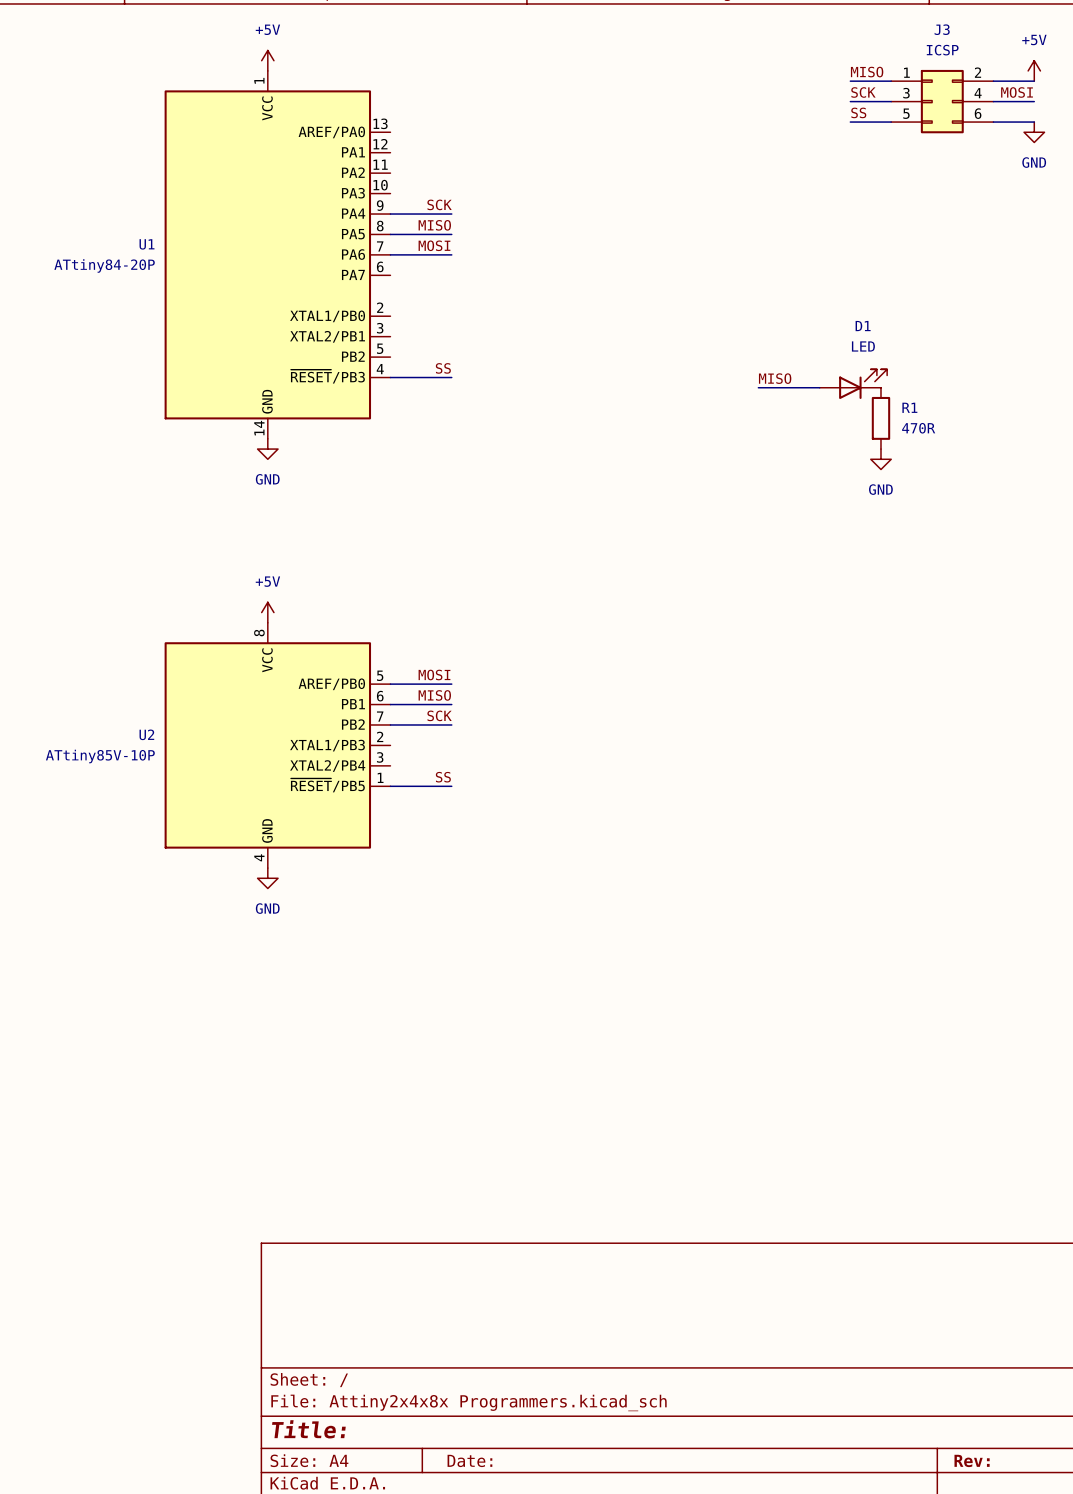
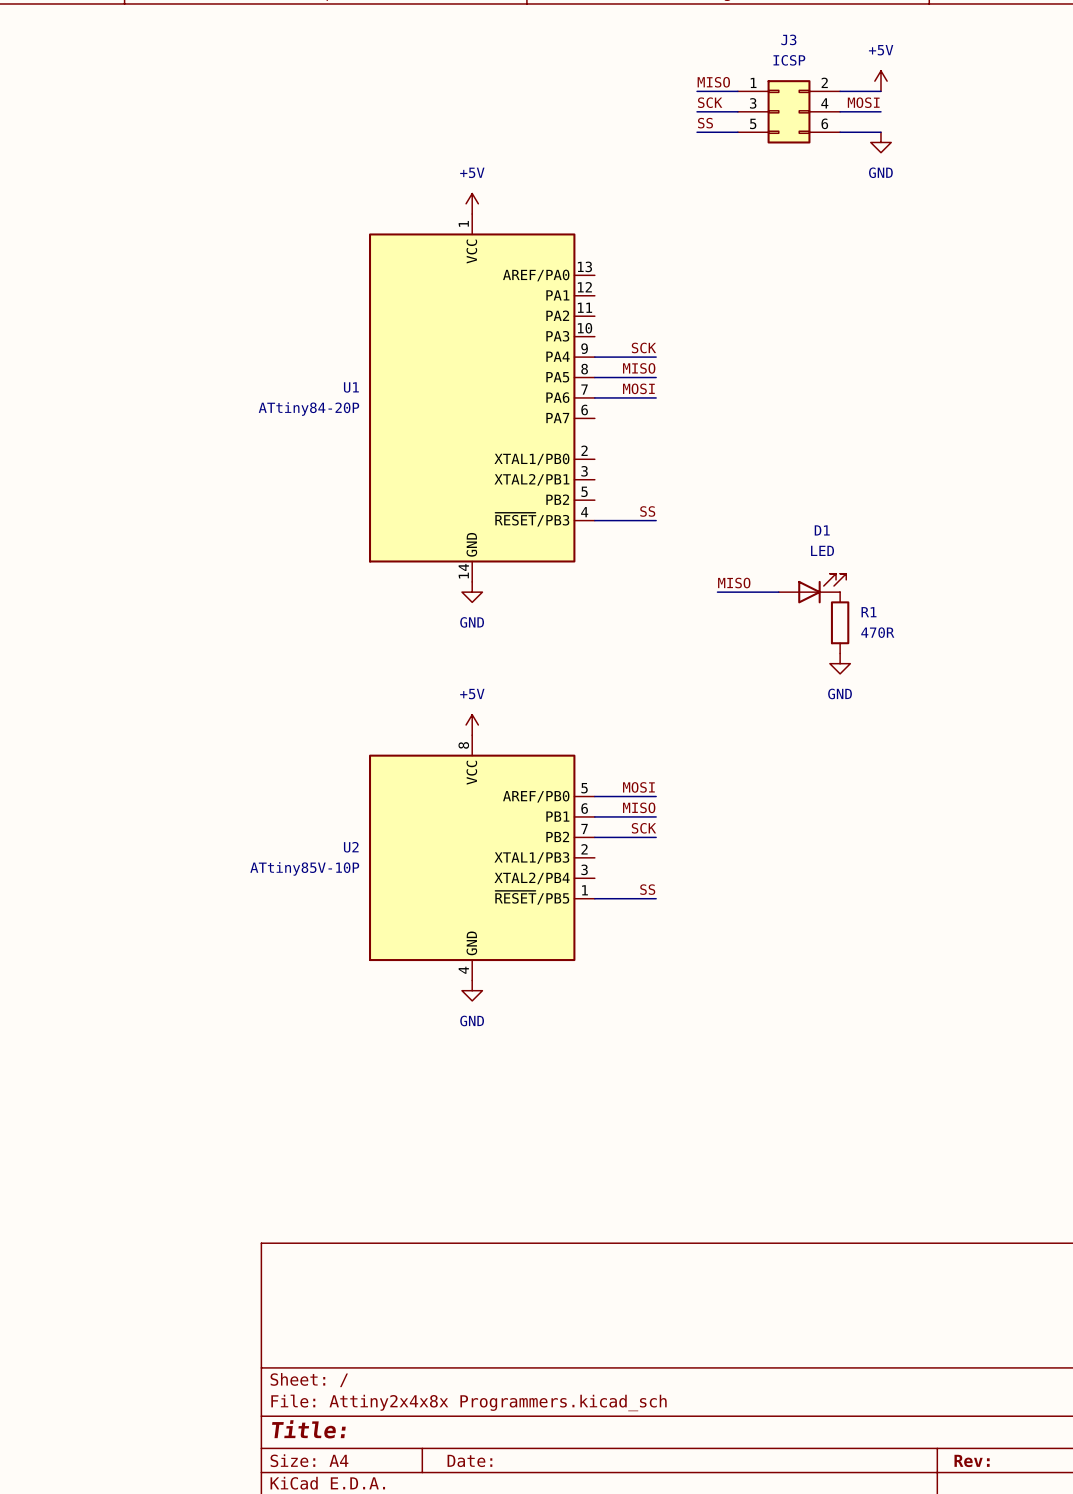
power symbol: +5V (267, 60) -> none
power symbol position: +5V (1034, 70) -> +5V (880, 81)
label: MISO (867, 72) -> none
wire: (850, 81) (891, 81) -> (697, 91) (737, 91)
wire: (993, 81) (1034, 81) -> (840, 91) (880, 91)
label: none -> MISO (713, 82)
label: SCK (863, 92) -> none
label position: MOSI (1017, 92) -> MOSI (863, 102)
wire: (850, 101) (891, 101) -> (697, 111) (737, 111)
J3 position: (942, 101) -> (789, 111)
wire: (993, 101) (1034, 101) -> (840, 111) (880, 111)
label: none -> SCK (710, 102)
label position: SS (858, 112) -> SS (705, 123)
wire: (850, 122) (891, 122) -> (697, 132) (737, 132)
wire: (993, 122) (1034, 122) -> (840, 132) (880, 132)
power symbol position: GND (1034, 132) -> GND (880, 142)
power symbol: none -> +5V (472, 203)
label: SCK (439, 204) -> none
wire: (390, 214) (451, 214) -> none
label: MISO (434, 225) -> none
label: MOSI (434, 245) -> none
U1 position: (277, 254) -> (481, 397)
label: none -> SCK (643, 347)
wire: none -> (594, 357) (656, 357)
label: SS (443, 368) -> none
label position: MISO (775, 378) -> MISO (639, 368)
D1 position: (853, 384) -> (812, 588)
wire: (758, 387) (819, 387) -> (594, 377) (656, 377)
label: none -> MOSI (638, 388)
wire: none -> (594, 397) (656, 397)
R1 position: (880, 418) -> (840, 622)
power symbol: GND (267, 449) -> none
power symbol: GND (880, 459) -> none
label: none -> SS (647, 511)
wire: none -> (594, 520) (656, 520)
label: none -> MISO (734, 583)
power symbol: none -> GND (472, 592)
wire: none -> (717, 592) (778, 592)
power symbol: +5V (267, 612) -> none
power symbol: none -> GND (840, 663)
label: MOSI (434, 675) -> none
wire: (390, 684) (451, 684) -> none
label: MISO (434, 695) -> none
wire: (390, 704) (451, 704) -> none
label: SCK (439, 715) -> none
wire: (390, 724) (451, 724) -> none
power symbol: none -> +5V (472, 724)
U2 position: (277, 745) -> (481, 857)
label: SS (443, 777) -> none
label: none -> MOSI (638, 787)
wire: none -> (594, 796) (656, 796)
label: none -> MISO (639, 807)
wire: none -> (594, 816) (656, 816)
label: none -> SCK (643, 828)
wire: none -> (594, 837) (656, 837)
power symbol: GND (267, 878) -> none
label: none -> SS (647, 889)
wire: none -> (594, 898) (656, 898)
power symbol: none -> GND (472, 990)

